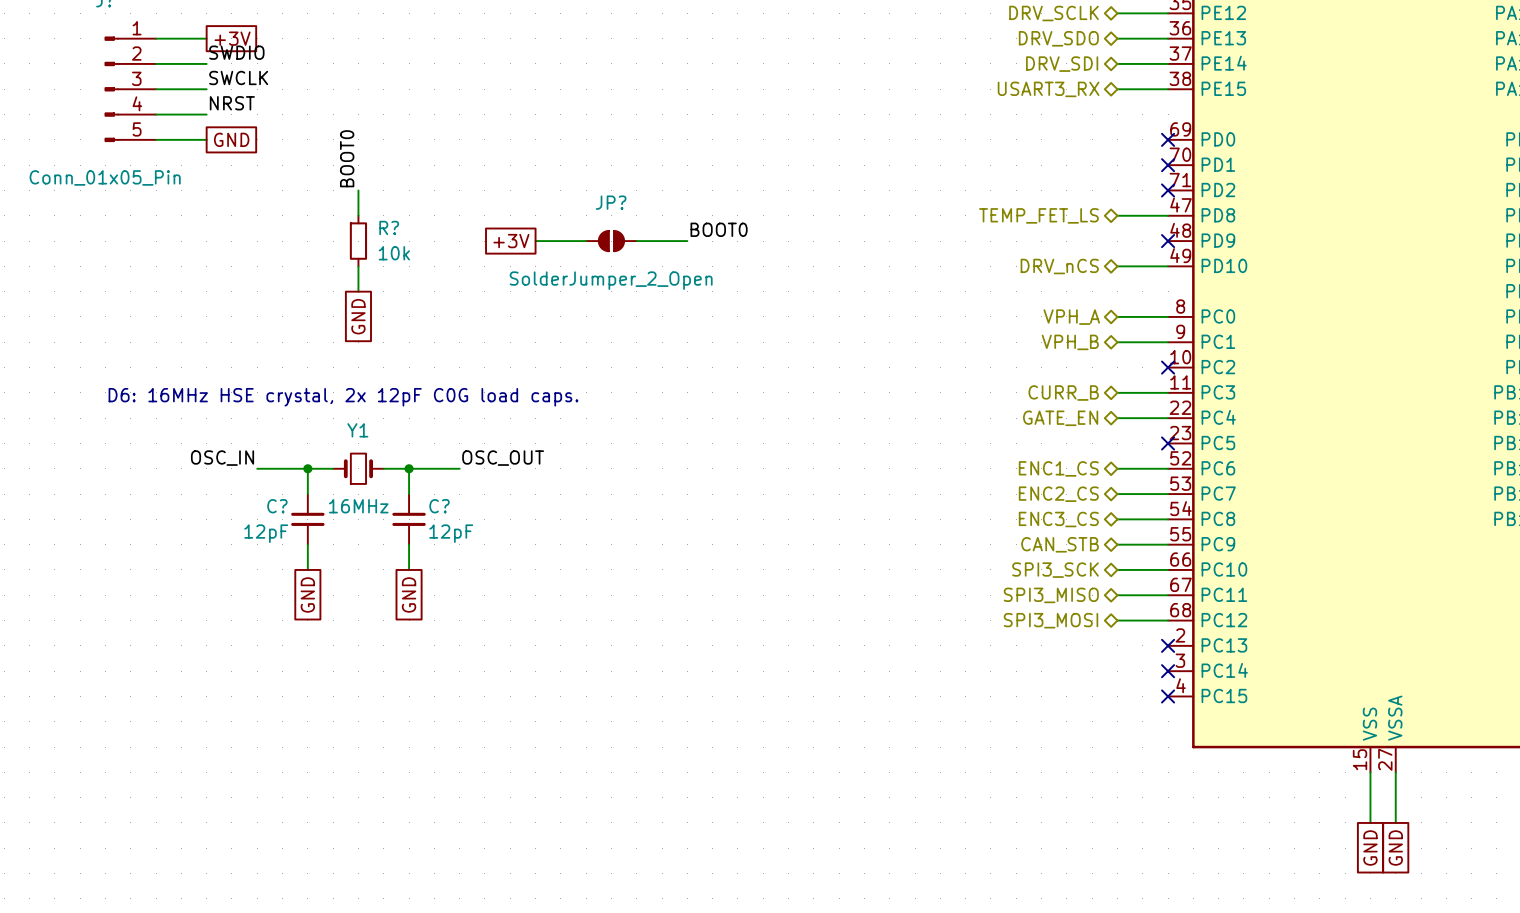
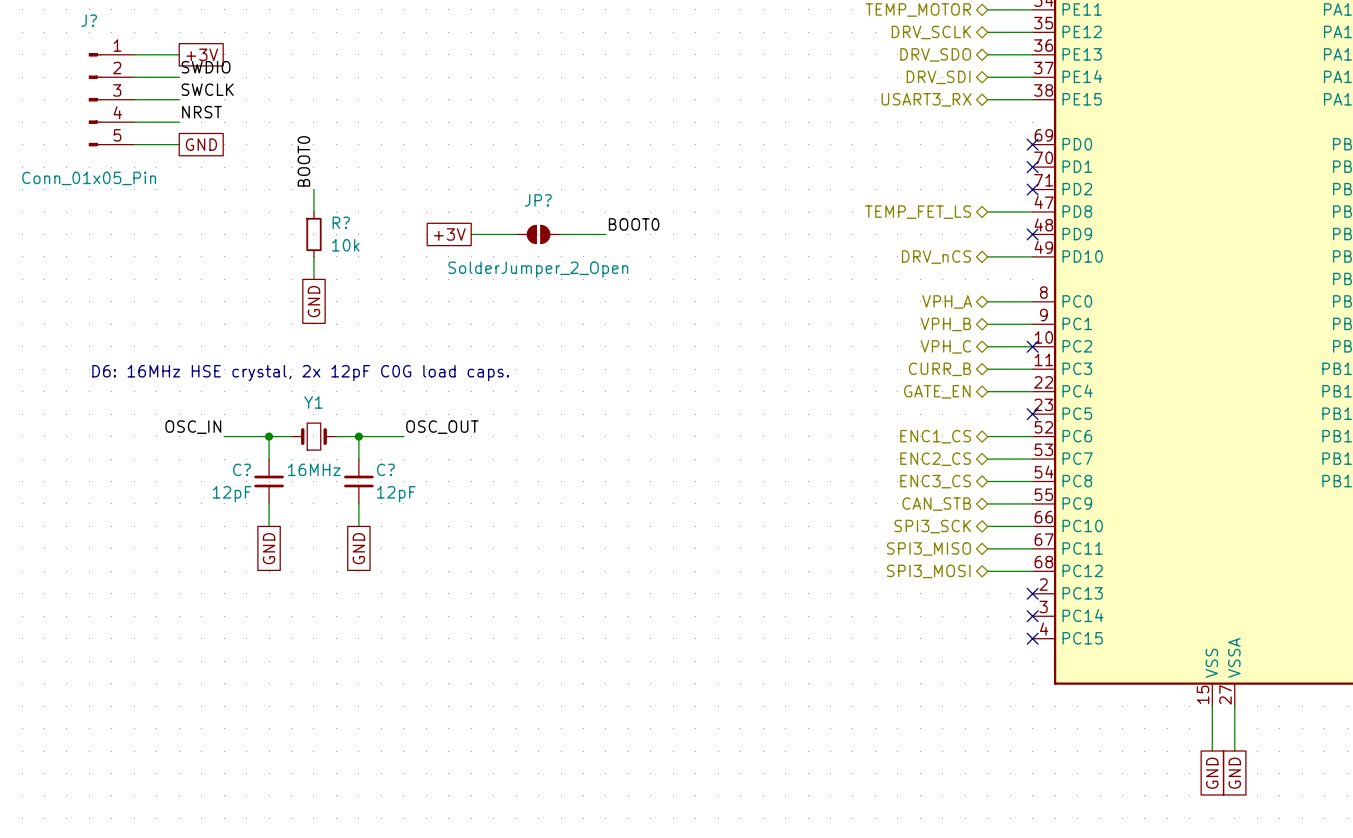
hierarchical label: none -> VPH_C (945, 346)
wire: none -> (987, 346) (1032, 346)

